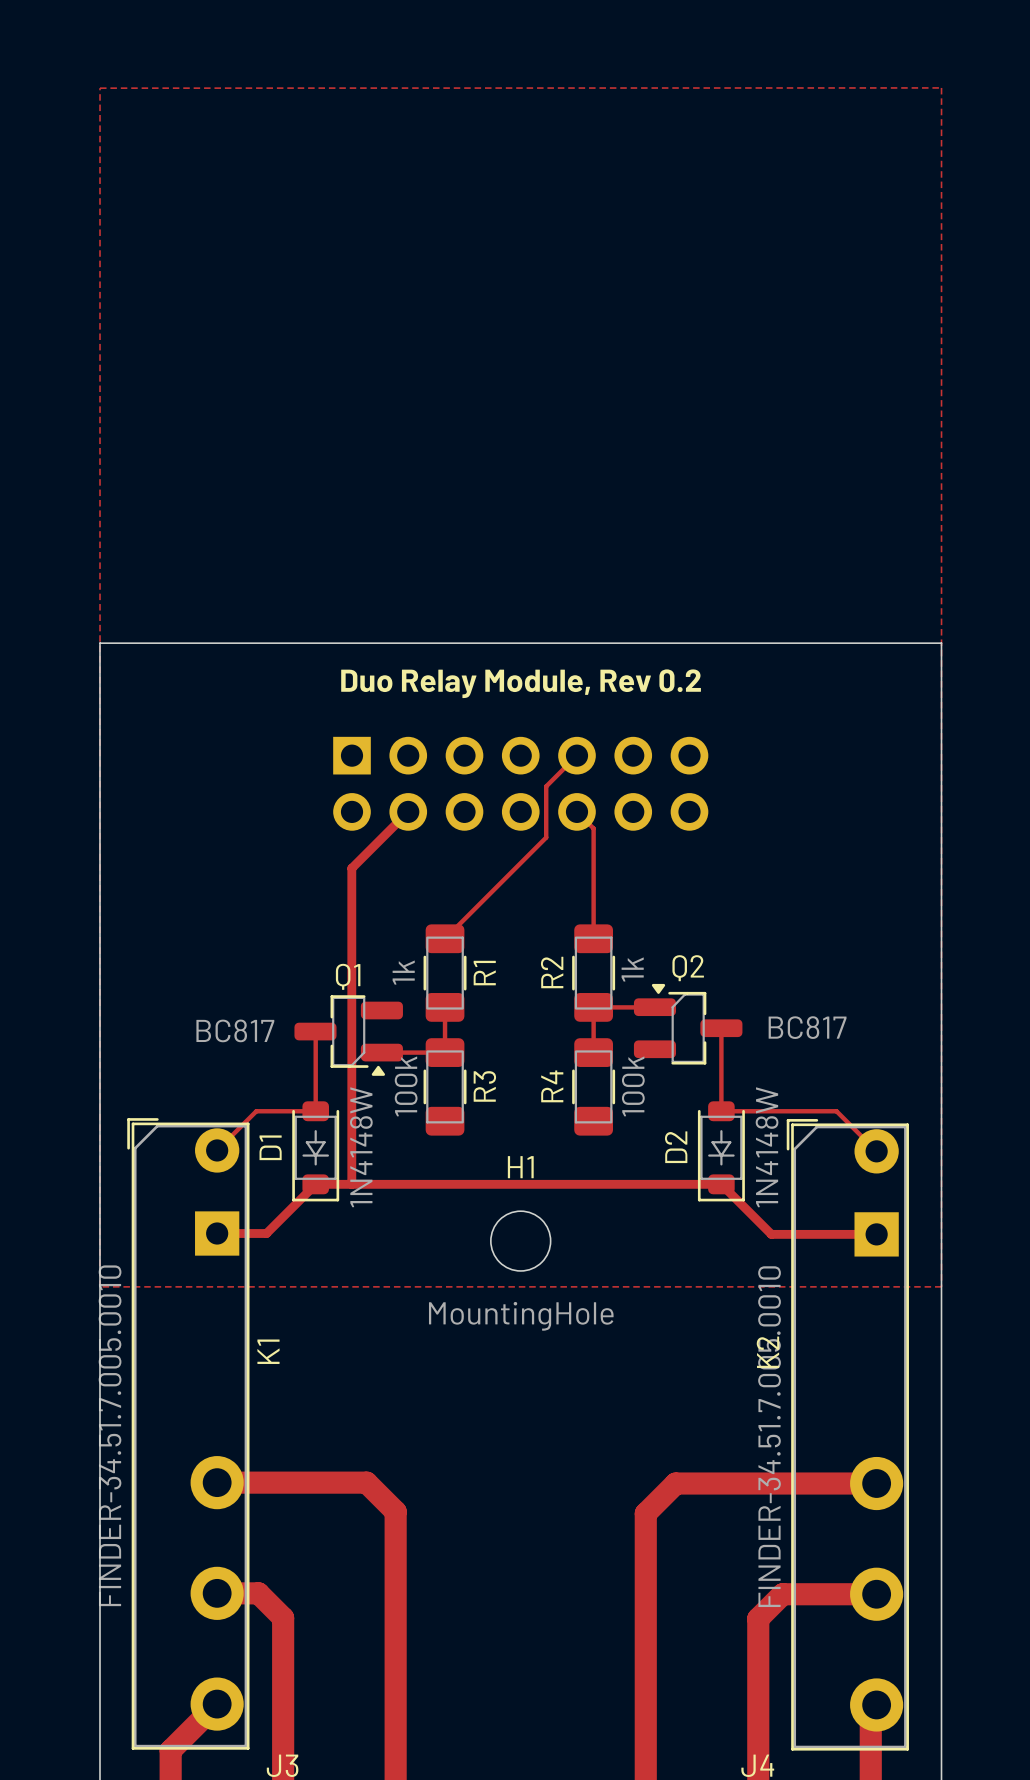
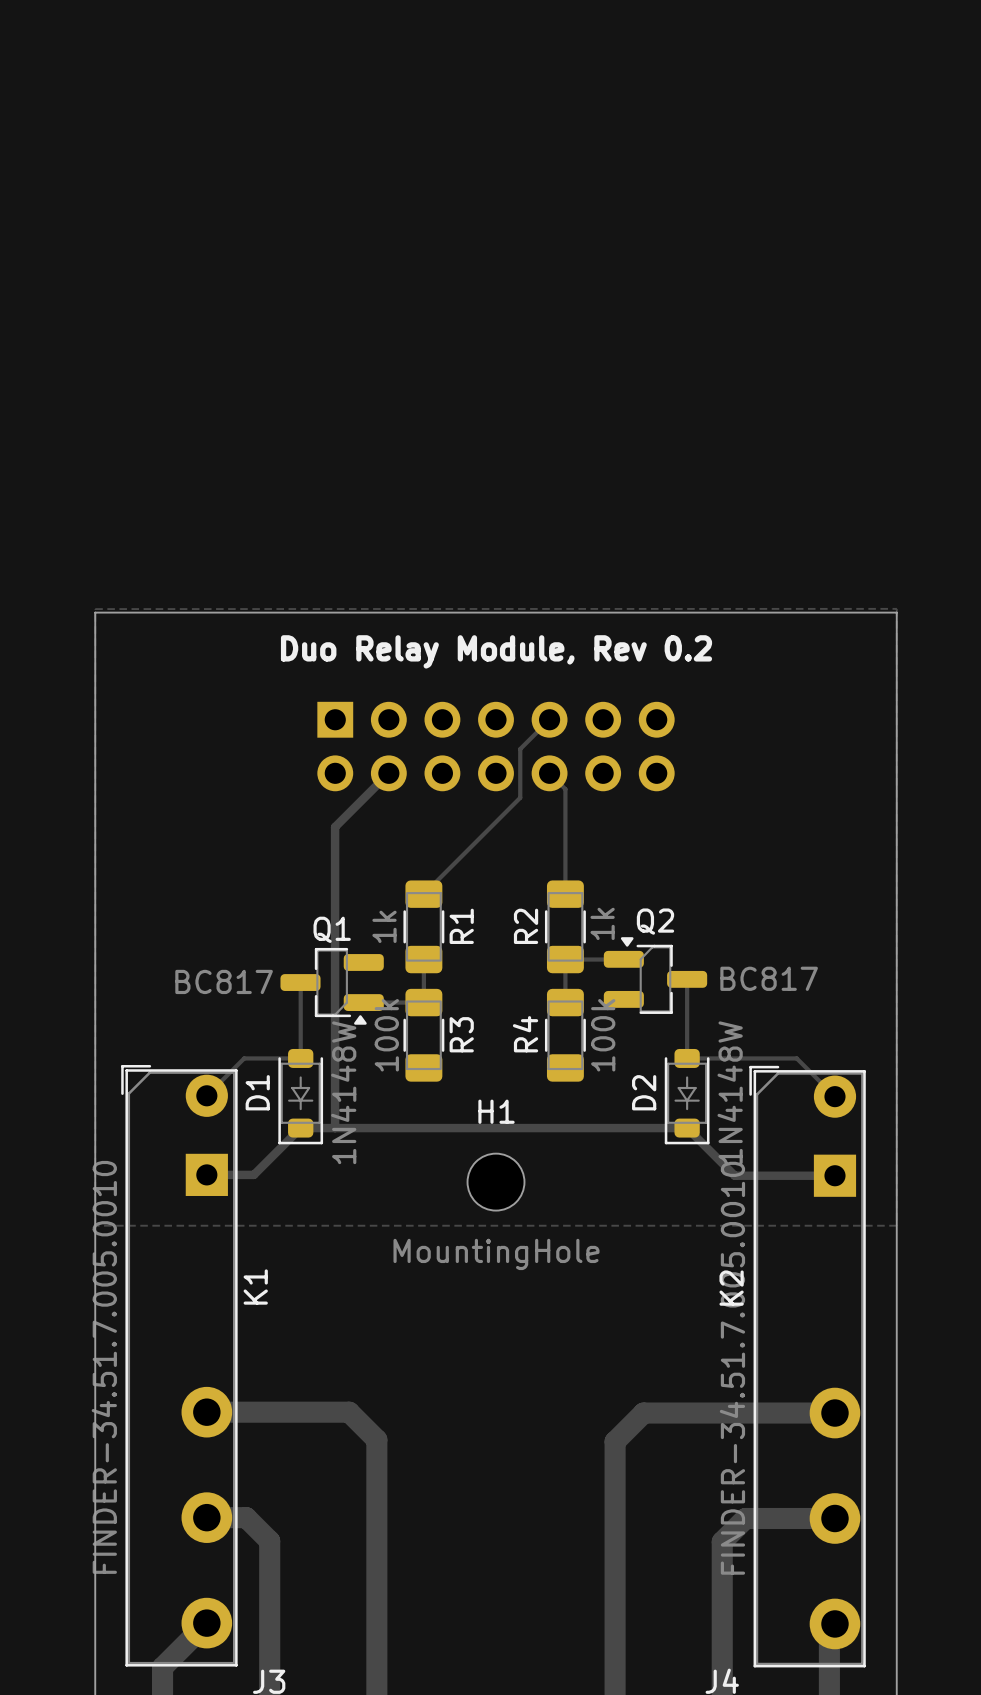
zone outline: (100, 639) (100, 88) (941, 87) (941, 639) -> (95, 609) (896, 608)

